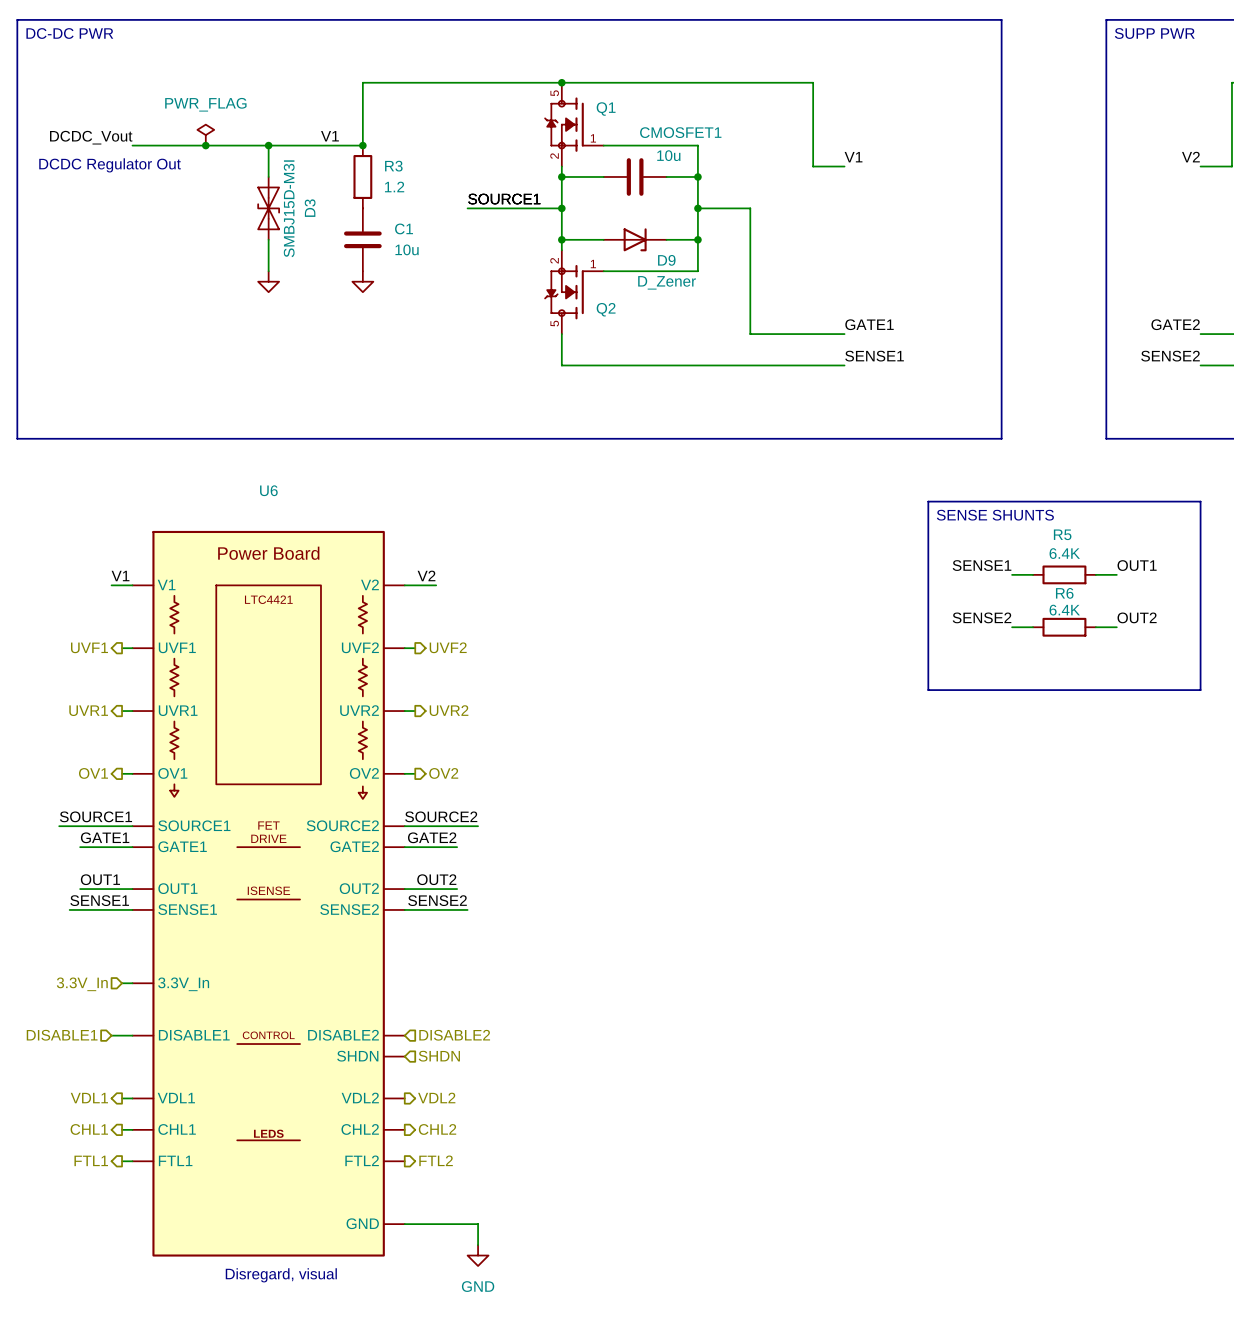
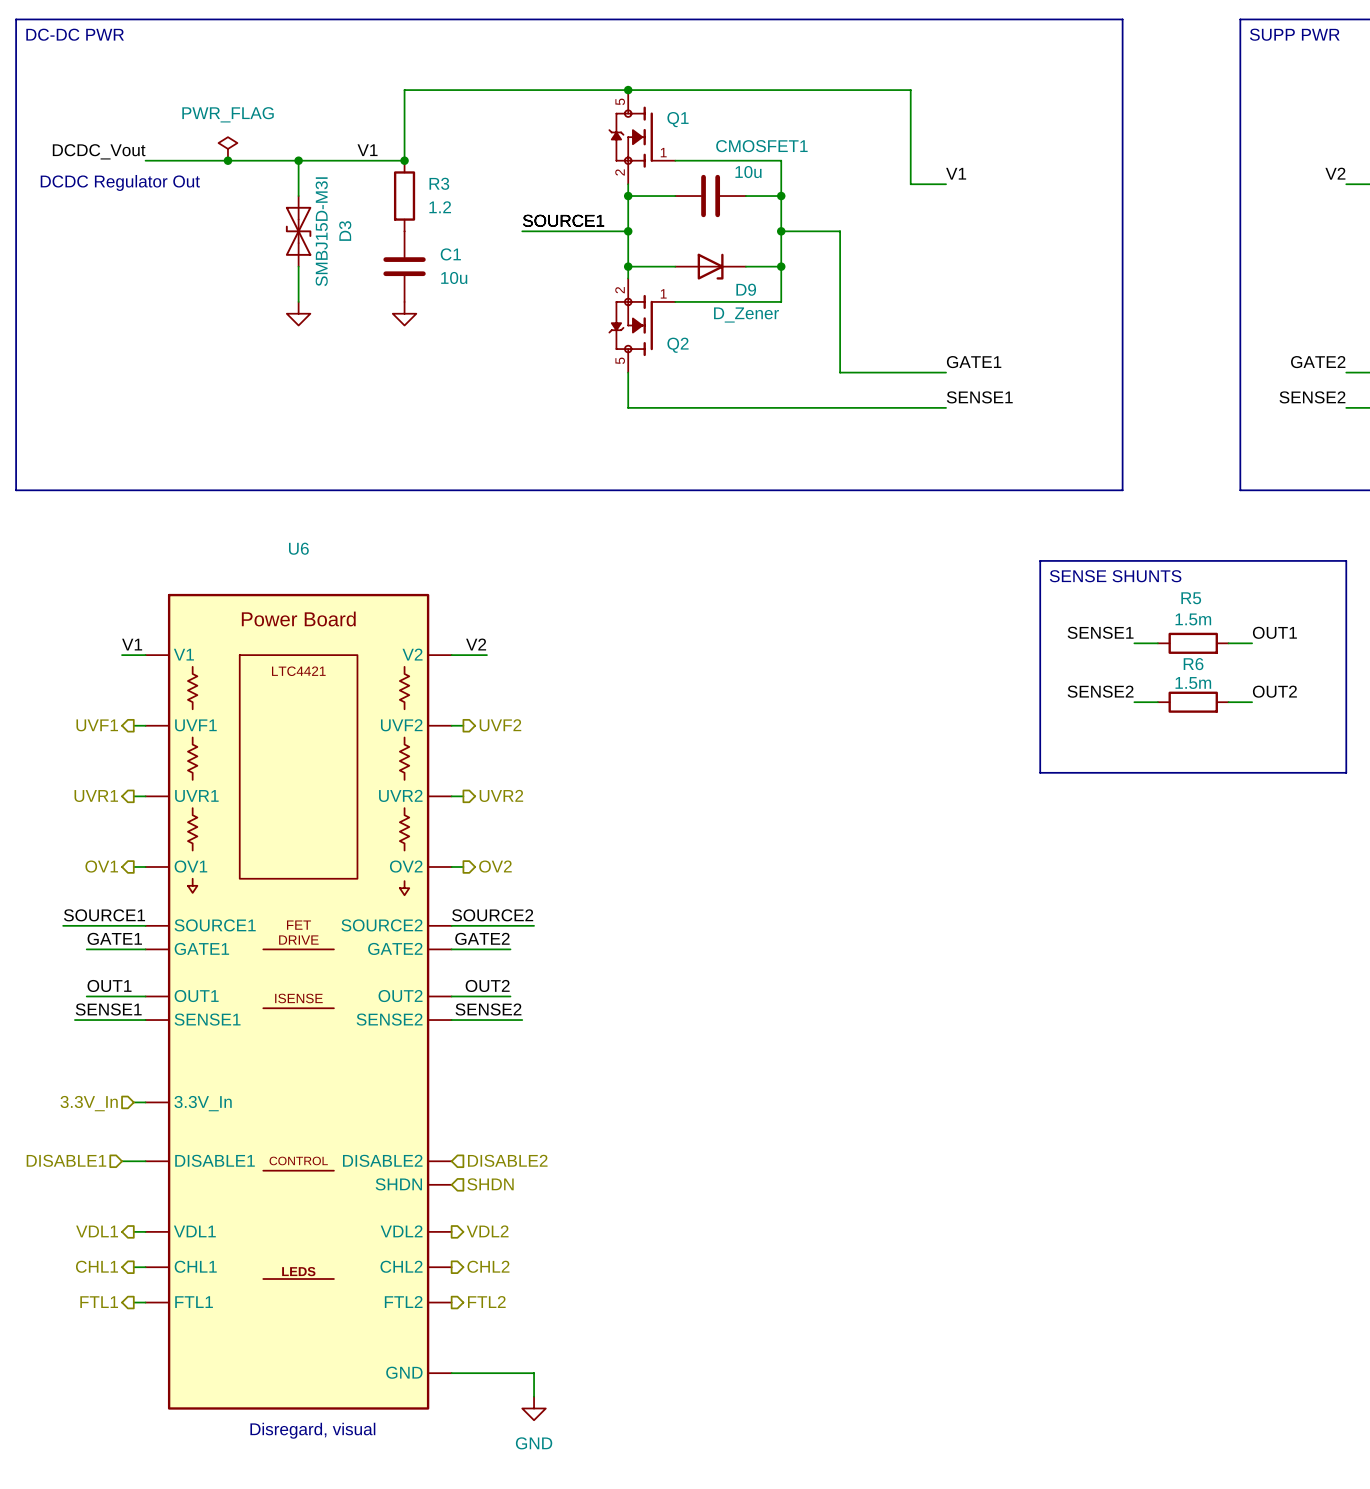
R5 value: 6.4K (1064, 553) -> 1.5m (1193, 619)
R6 value: 6.4K (1064, 610) -> 1.5m (1193, 683)

